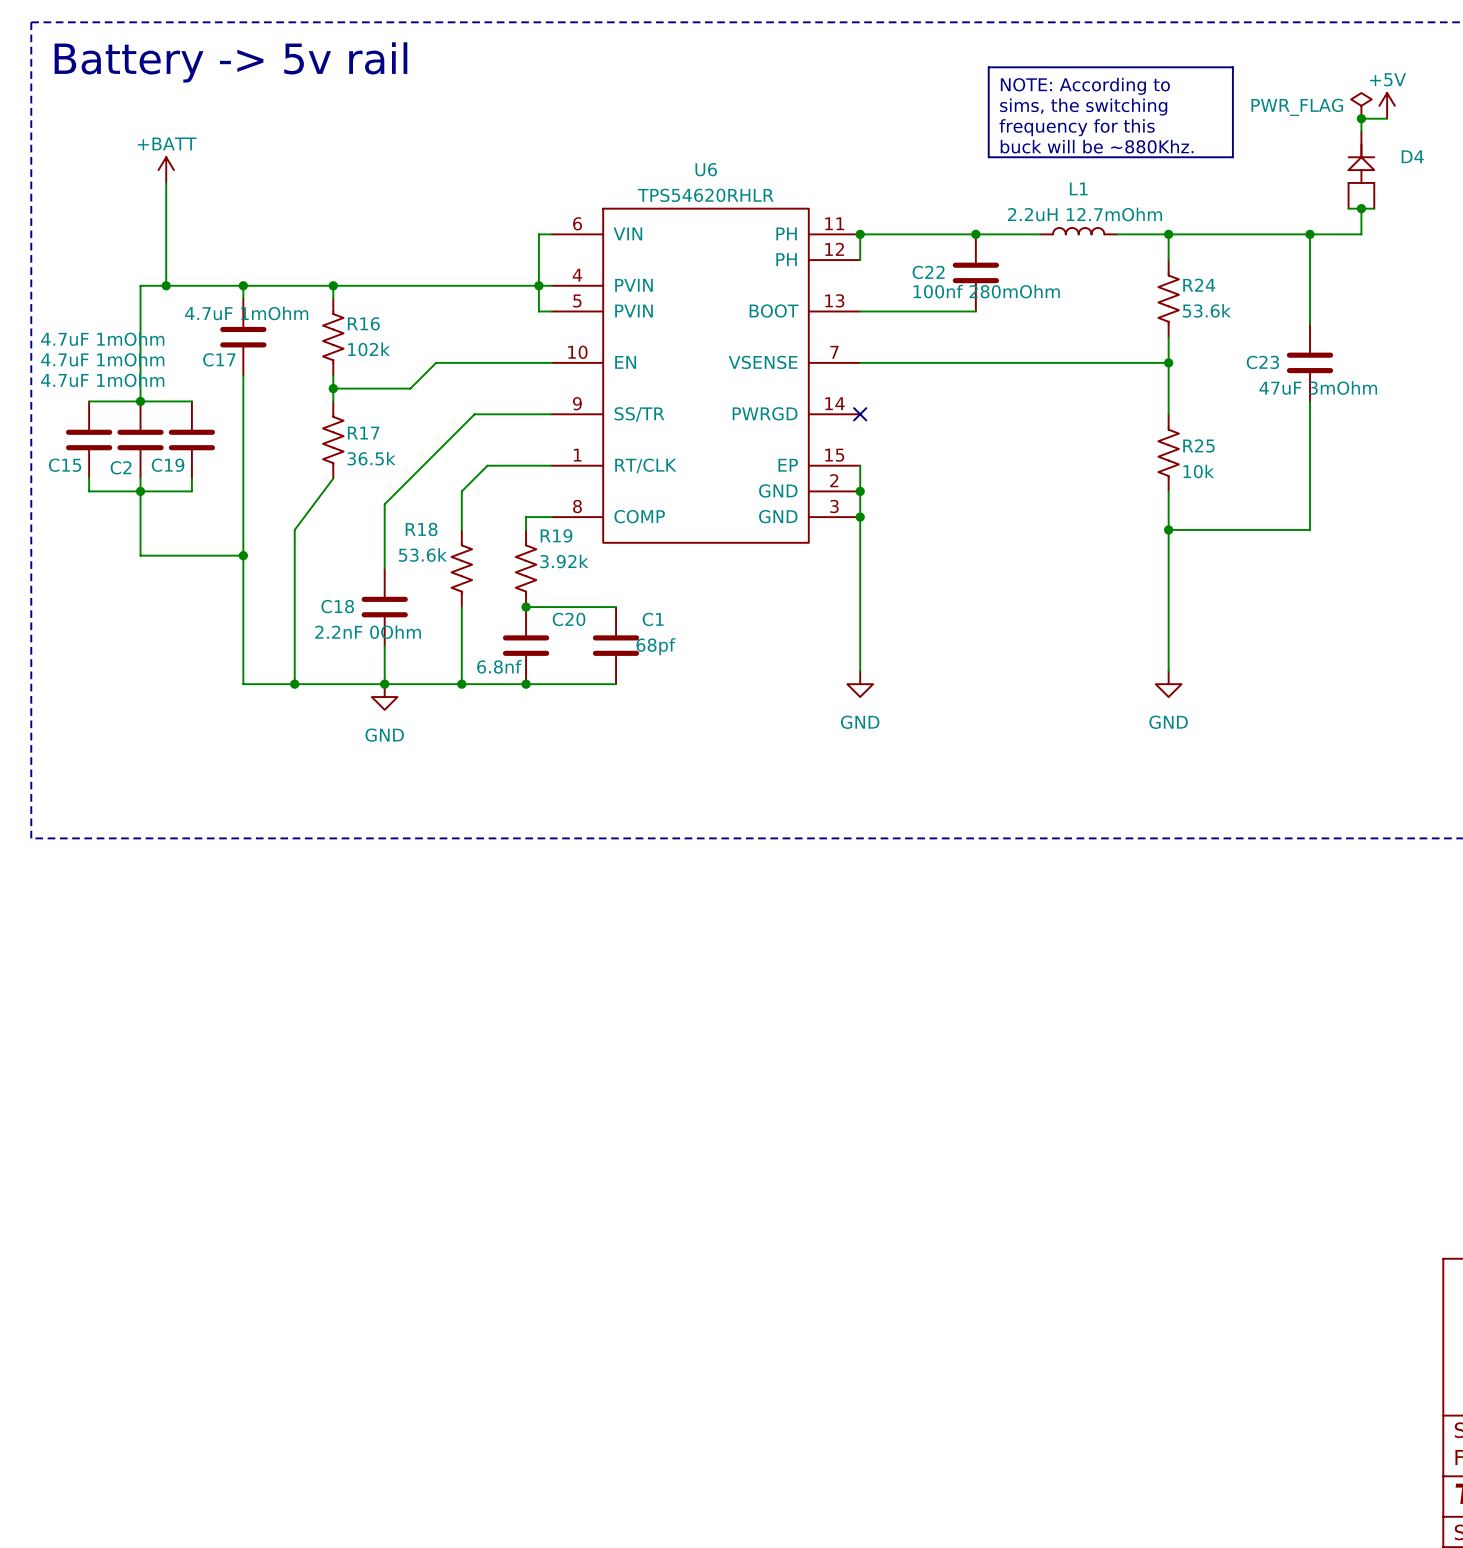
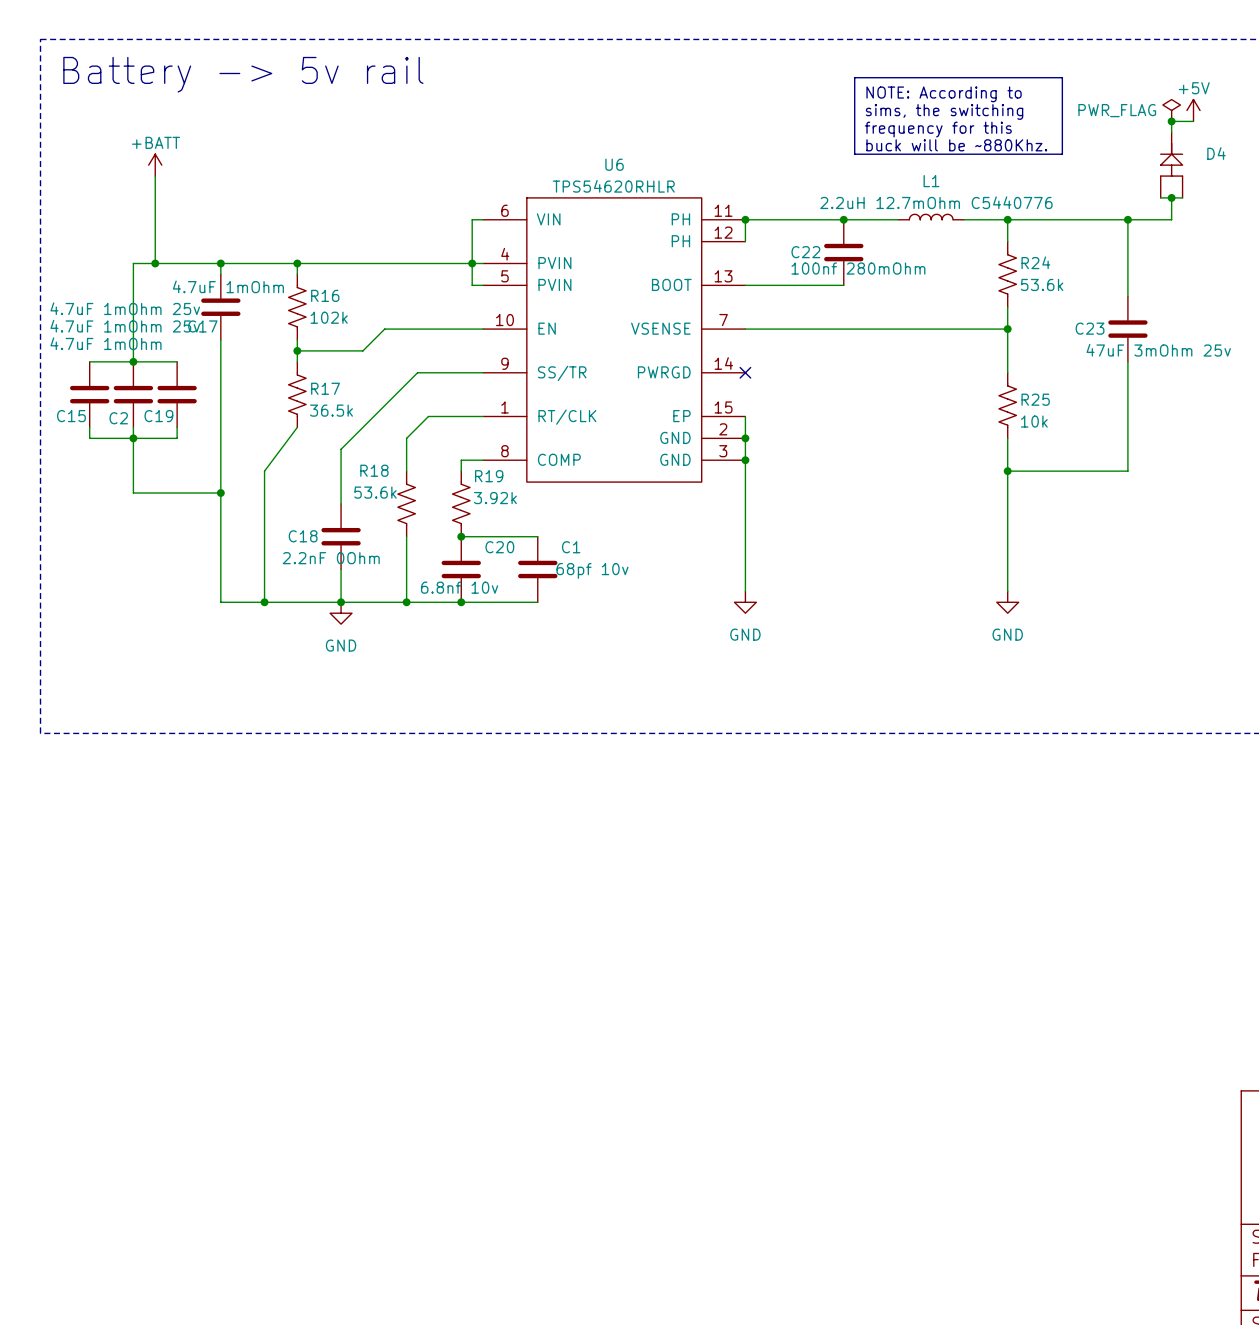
L1 value: 2.2uH 12.7mOhm (1085, 214) -> 2.2uH 12.7mOhm C5440776 (936, 202)
C15 value: 4.7uF 1mOhm (102, 339) -> 4.7uF 1mOhm 25v (125, 308)
C2 value: 4.7uF 1mOhm (102, 359) -> 4.7uF 1mOhm 25v (125, 326)
C23 value: 47uF 3mOhm (1318, 387) -> 47uF 3mOhm 25v (1158, 350)
C1 value: 68pf (656, 646) -> 68pf 10v (592, 570)
C20 value: 6.8nf (499, 666) -> 6.8nf 10v (459, 587)

